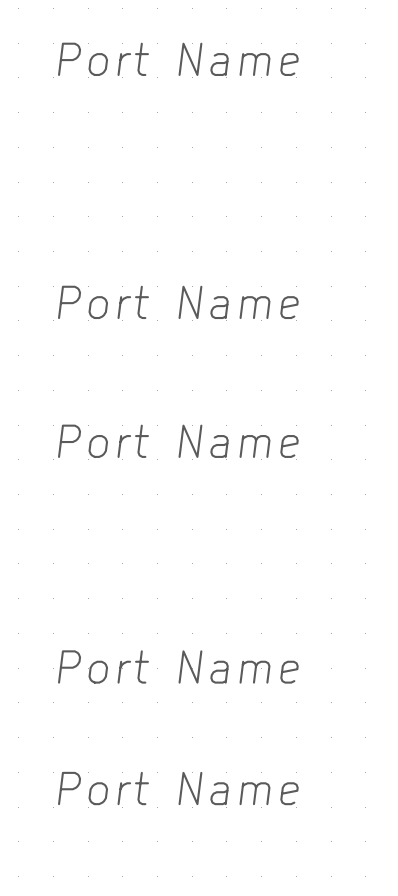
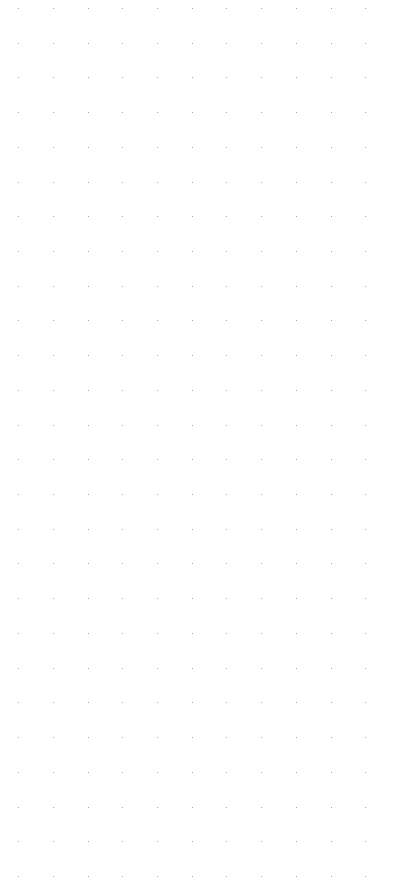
text: Port Name (178, 59) -> none
text: Port Name (178, 302) -> none
text: Port Name (178, 441) -> none
text: Port Name (178, 666) -> none
text: Port Name (178, 788) -> none

